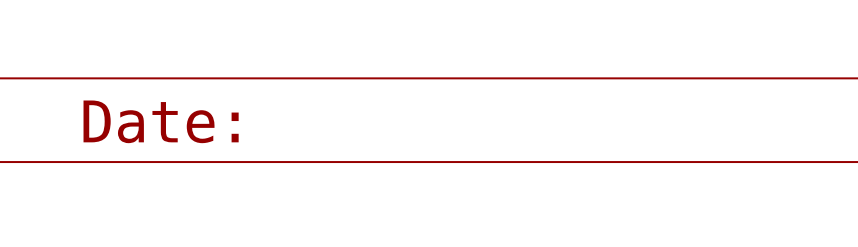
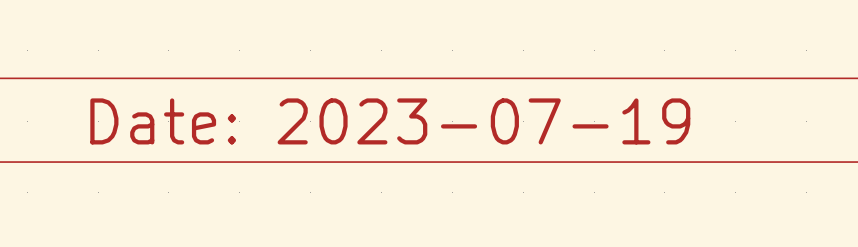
title block: Date: (161, 121) -> Date: 2023-07-19 (390, 121)

